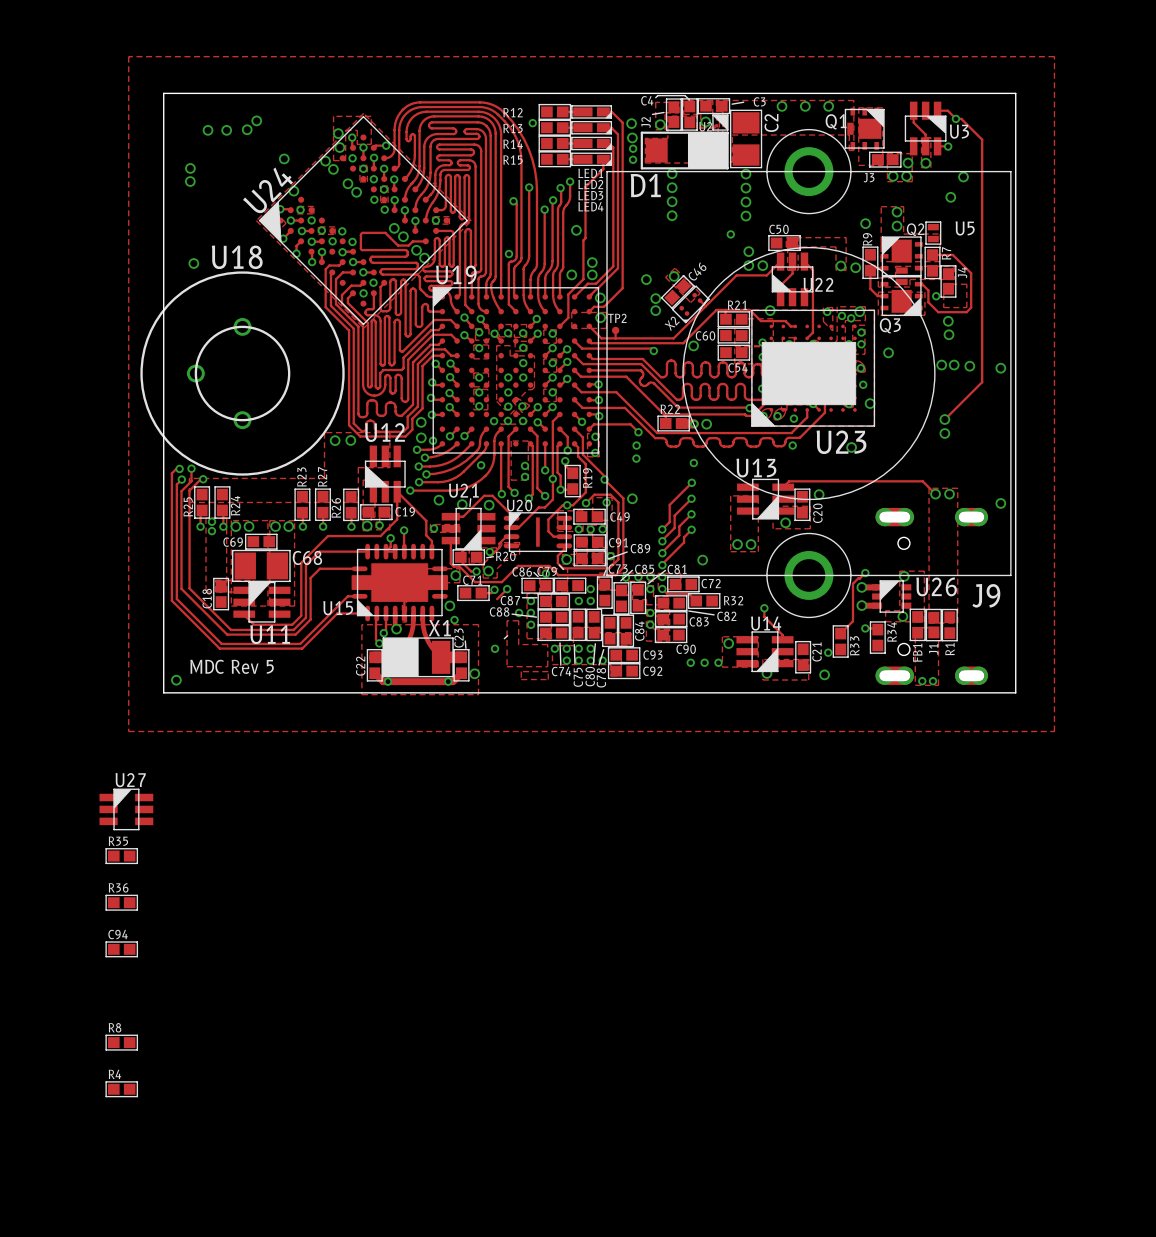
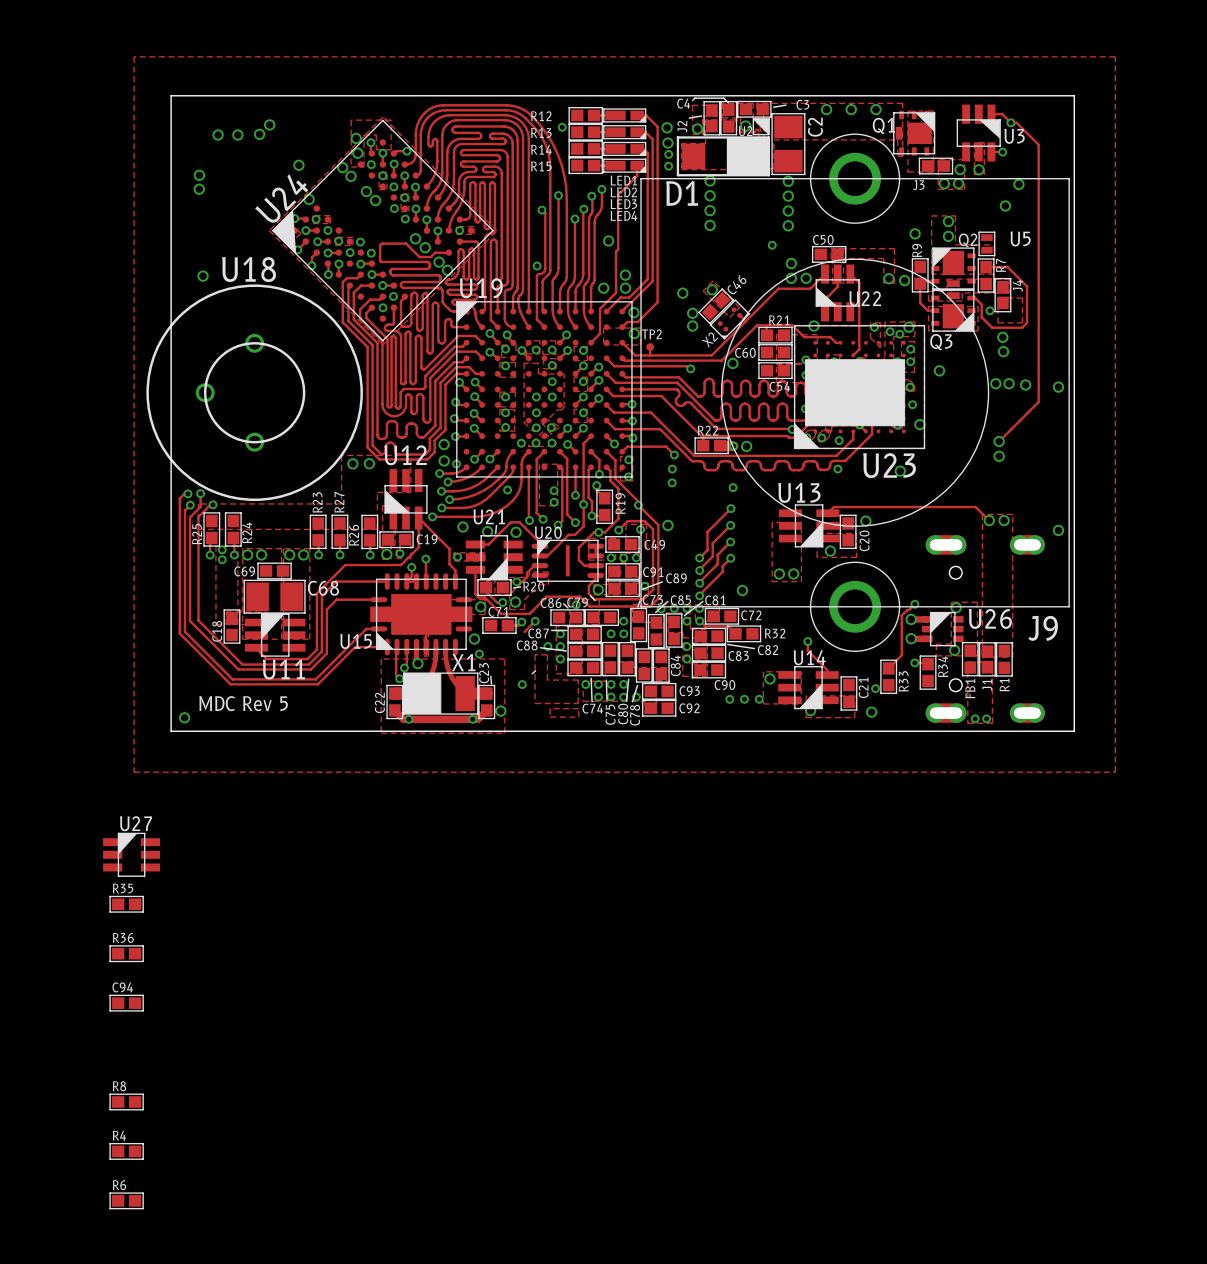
track: (913, 110) (913, 122) (925, 134) (925, 146) -> none
R6: none -> (126, 1200)

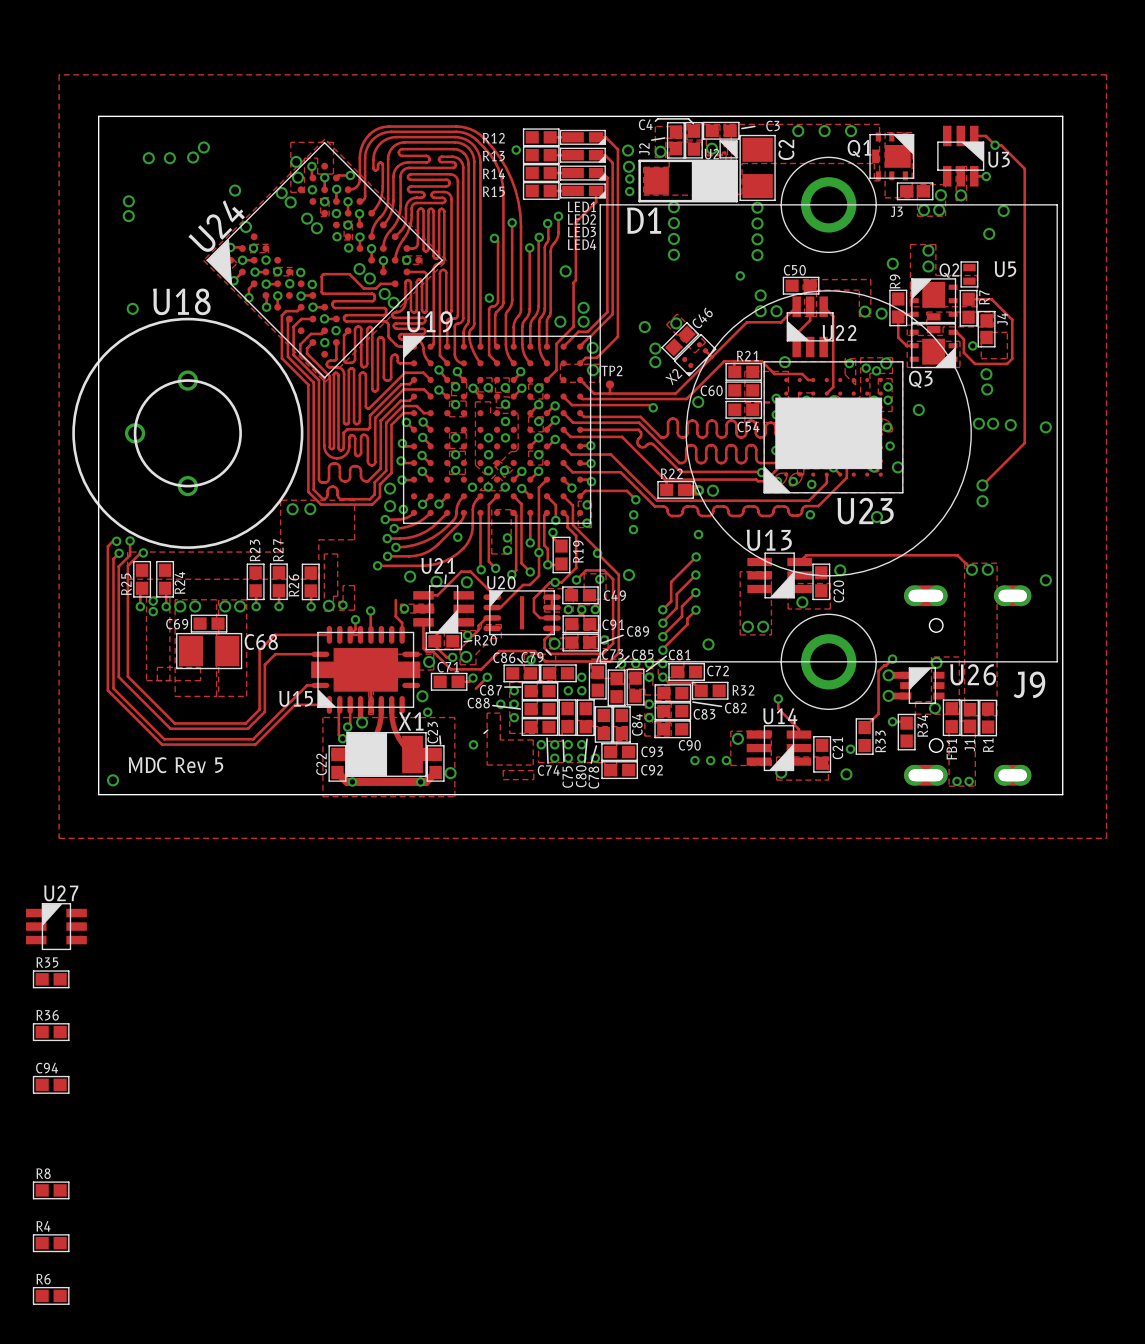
U12: (405, 499) -> none
C19: (396, 539) -> none
track: (449, 548) (418, 518) (418, 547) (400, 565) (345, 565) (316, 593) (316, 649) (307, 659) (266, 659) (256, 647) -> none
C18: (231, 626) -> none
U11: (275, 635) -> none

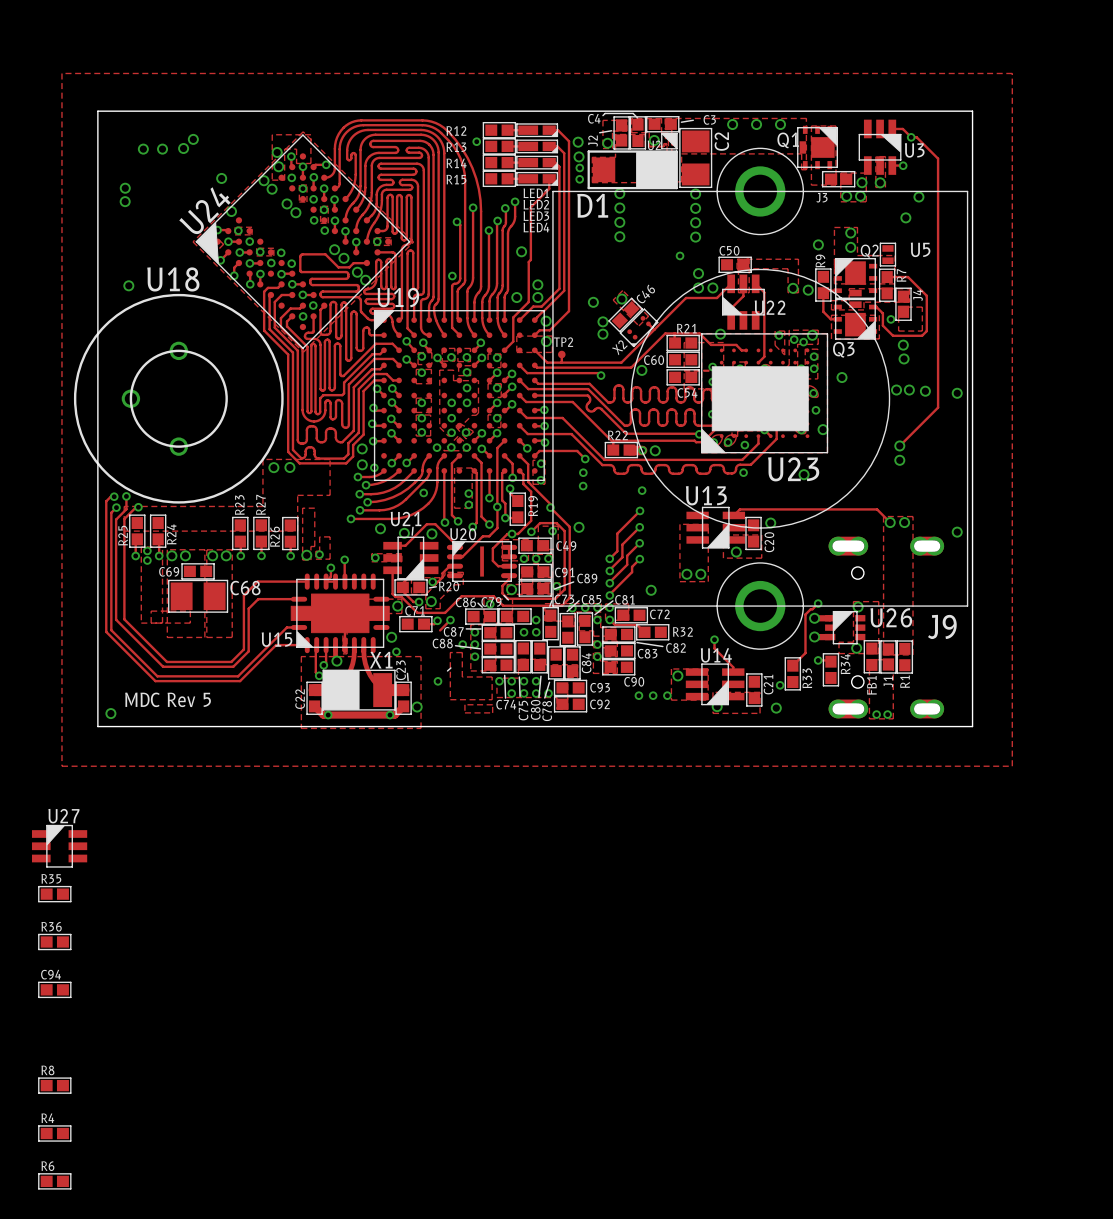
track: (395, 600) (395, 616) (402, 622) (402, 634) -> none

